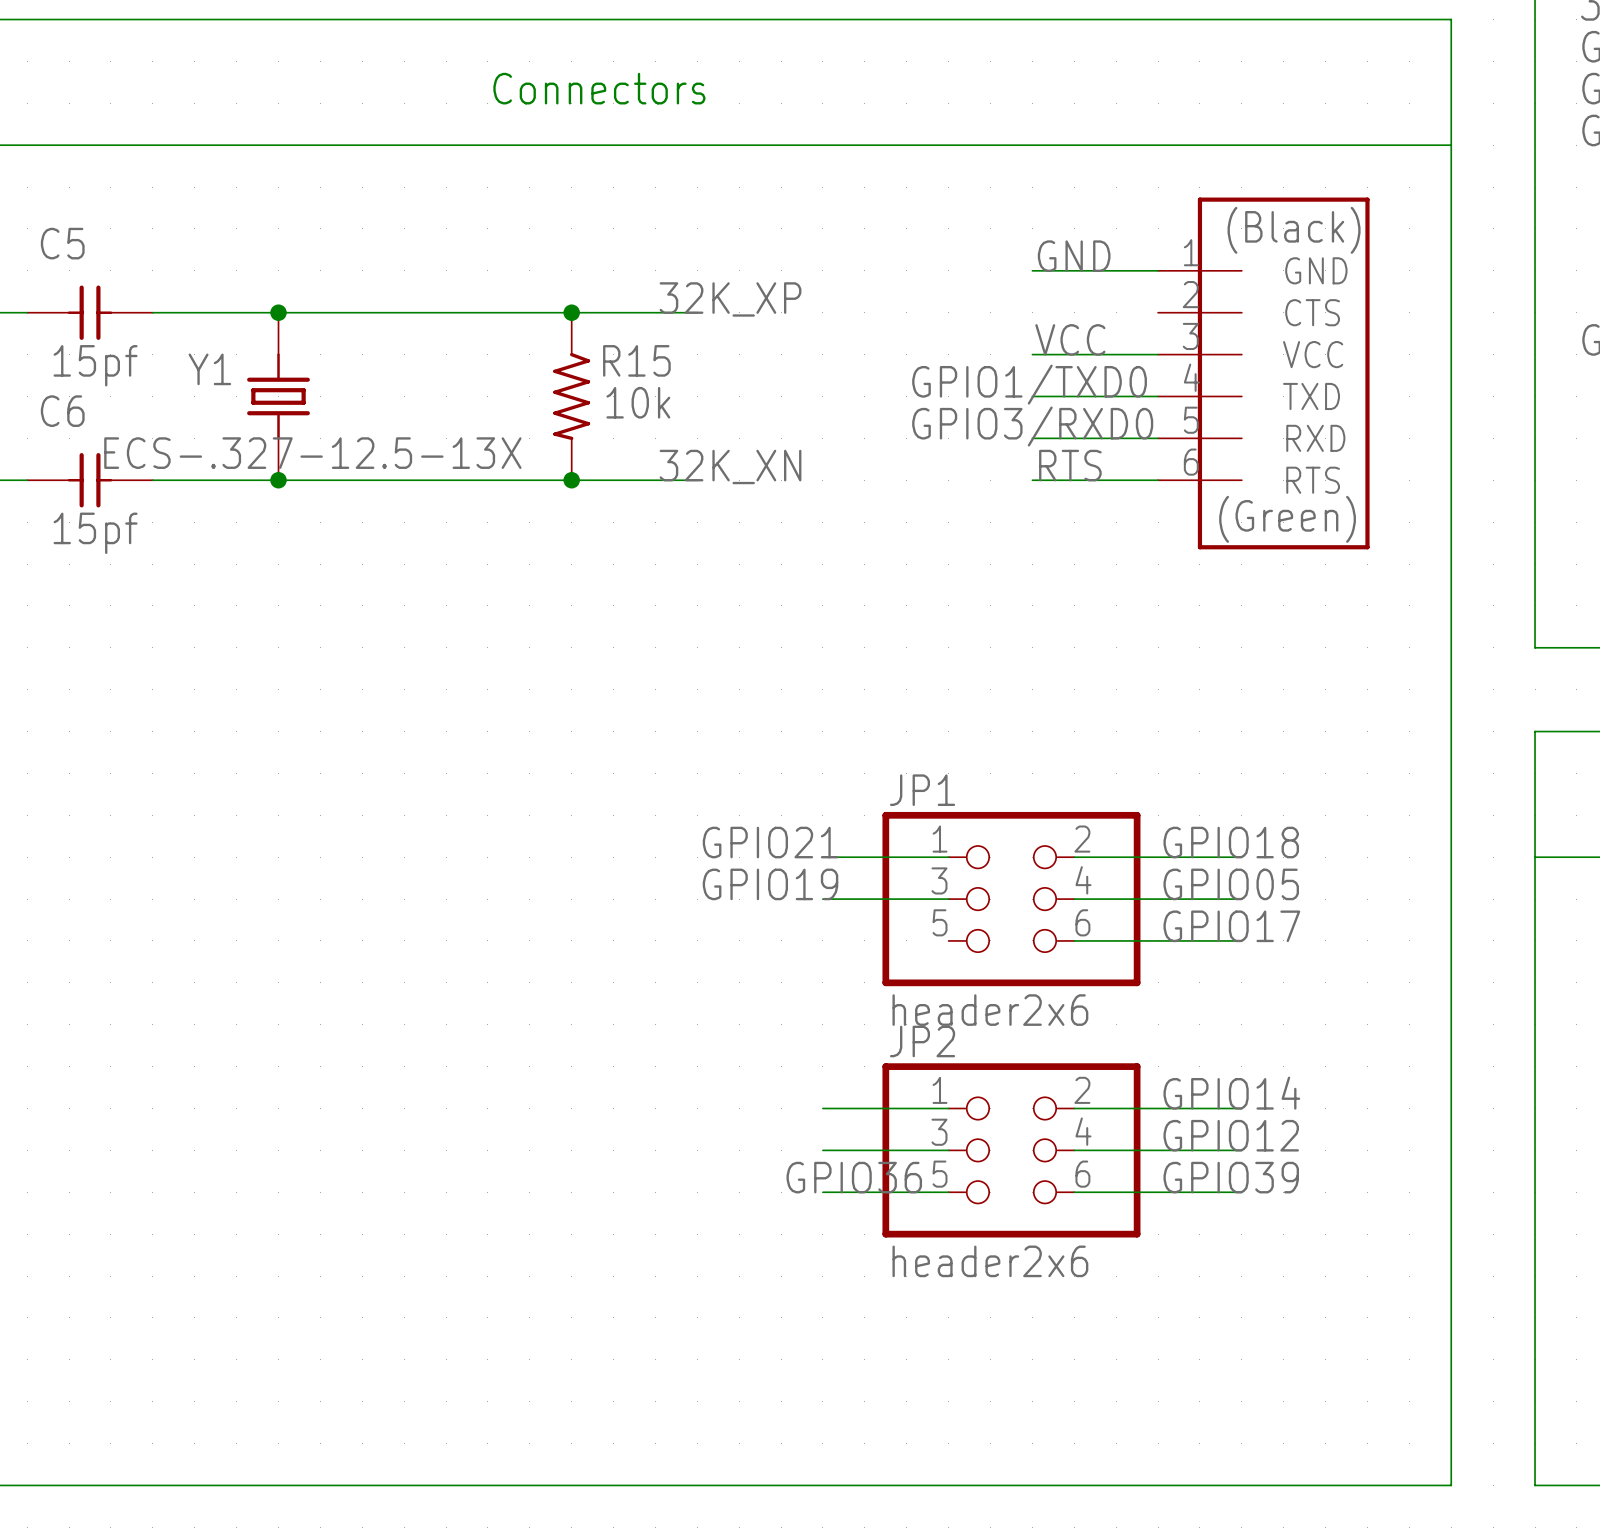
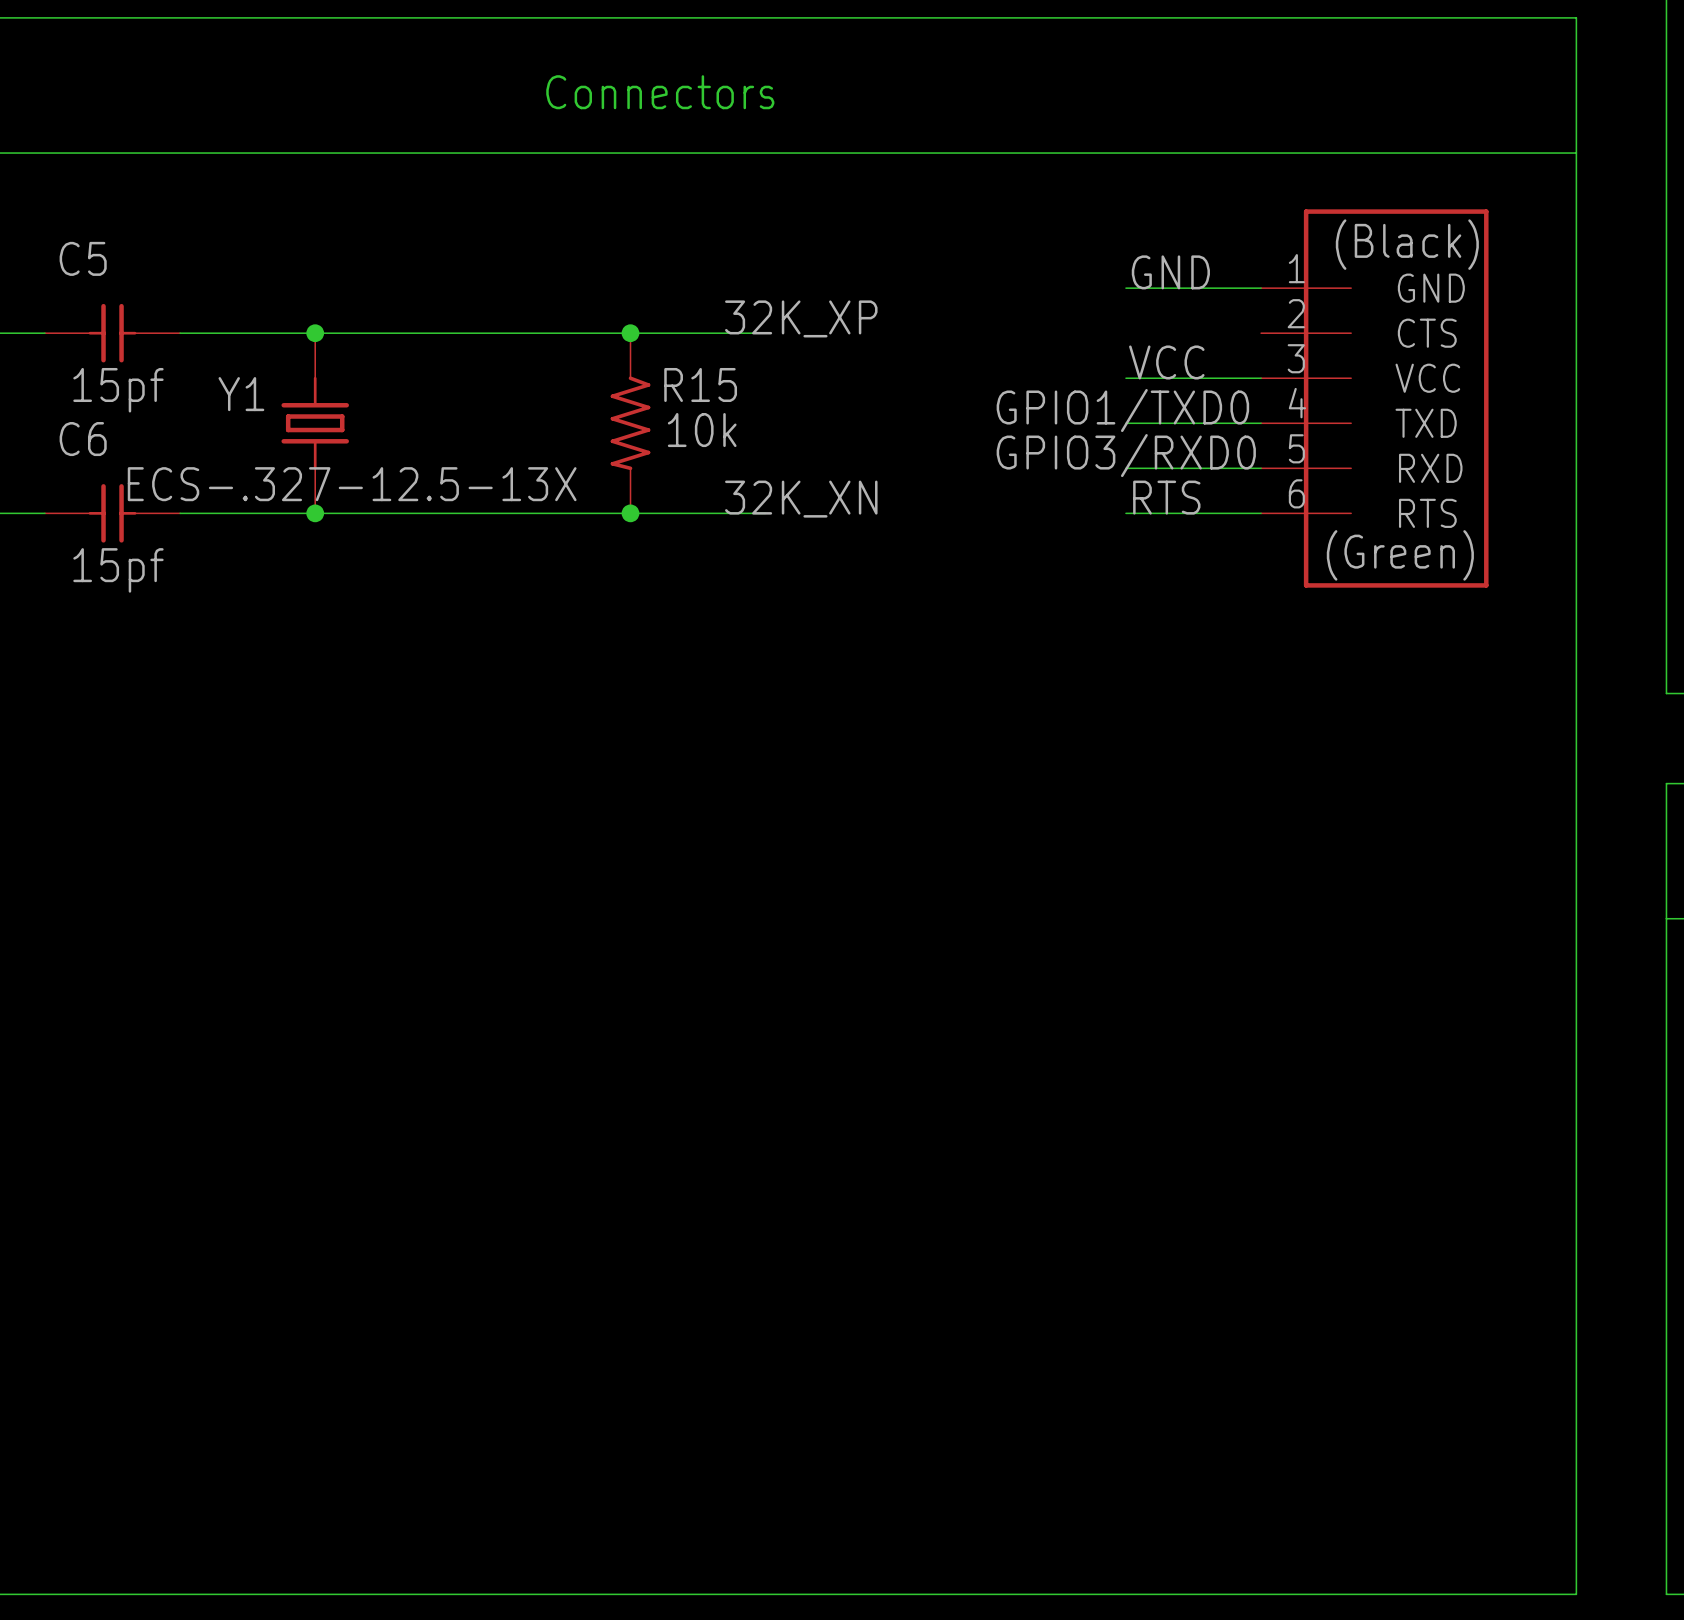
label: GPIO21 (770, 842) -> none
label: GPIO18 (1231, 842) -> none
wire: (822, 857) (948, 857) -> none
wire: (1074, 857) (1241, 857) -> none
label: GPIO19 (770, 884) -> none
label: GPIO05 (1231, 884) -> none
wire: (822, 899) (948, 899) -> none
JP1: header2x6 (1011, 899) -> none
wire: (1074, 899) (1241, 899) -> none
label: GPIO17 (1231, 926) -> none
wire: (1074, 940) (1241, 940) -> none
label: GPIO14 (1231, 1093) -> none
wire: (822, 1108) (948, 1108) -> none
wire: (1074, 1108) (1241, 1108) -> none
label: GPIO12 (1231, 1135) -> none
wire: (822, 1150) (948, 1150) -> none
JP2: header2x6 (1011, 1150) -> none
wire: (1074, 1150) (1241, 1150) -> none
label: GPIO36 (854, 1177) -> none
label: GPIO39 (1231, 1177) -> none
wire: (822, 1192) (948, 1192) -> none
wire: (1074, 1192) (1241, 1192) -> none

